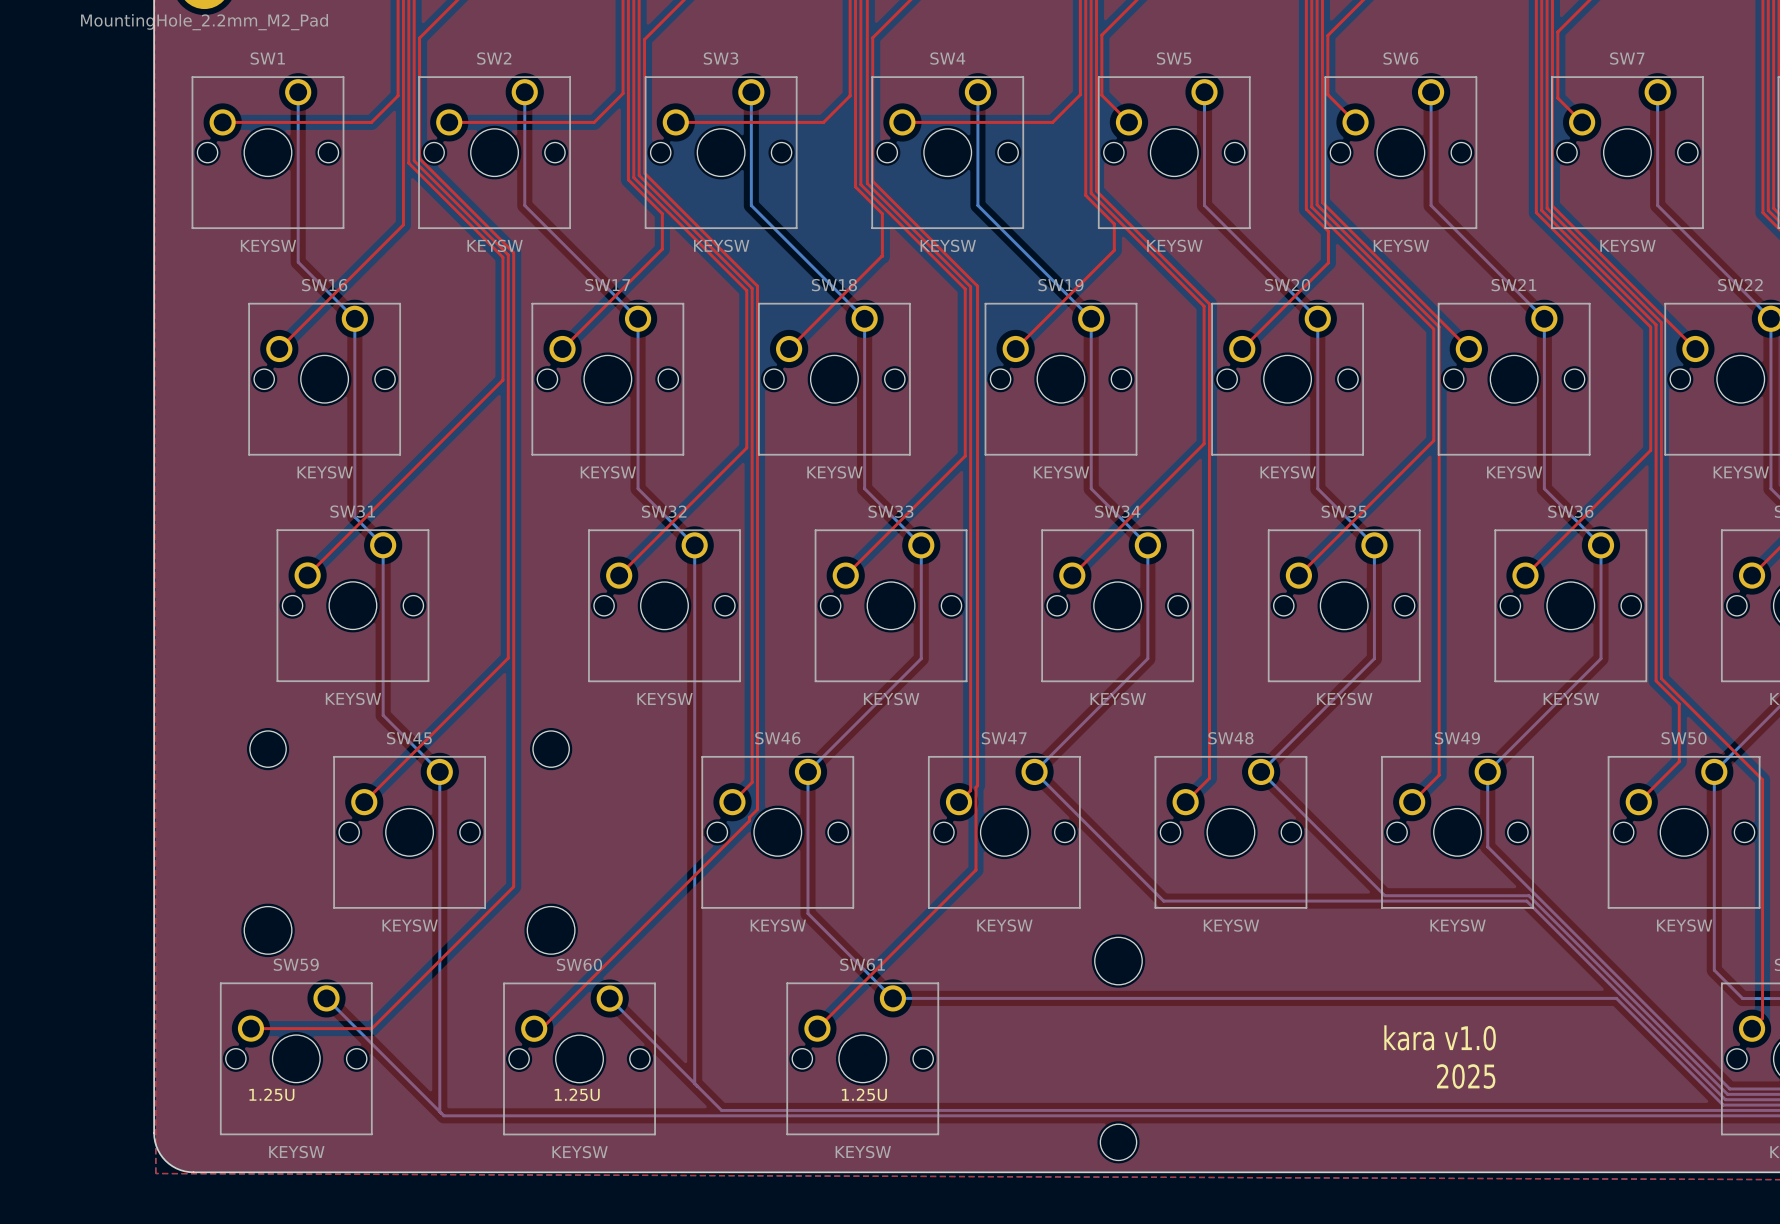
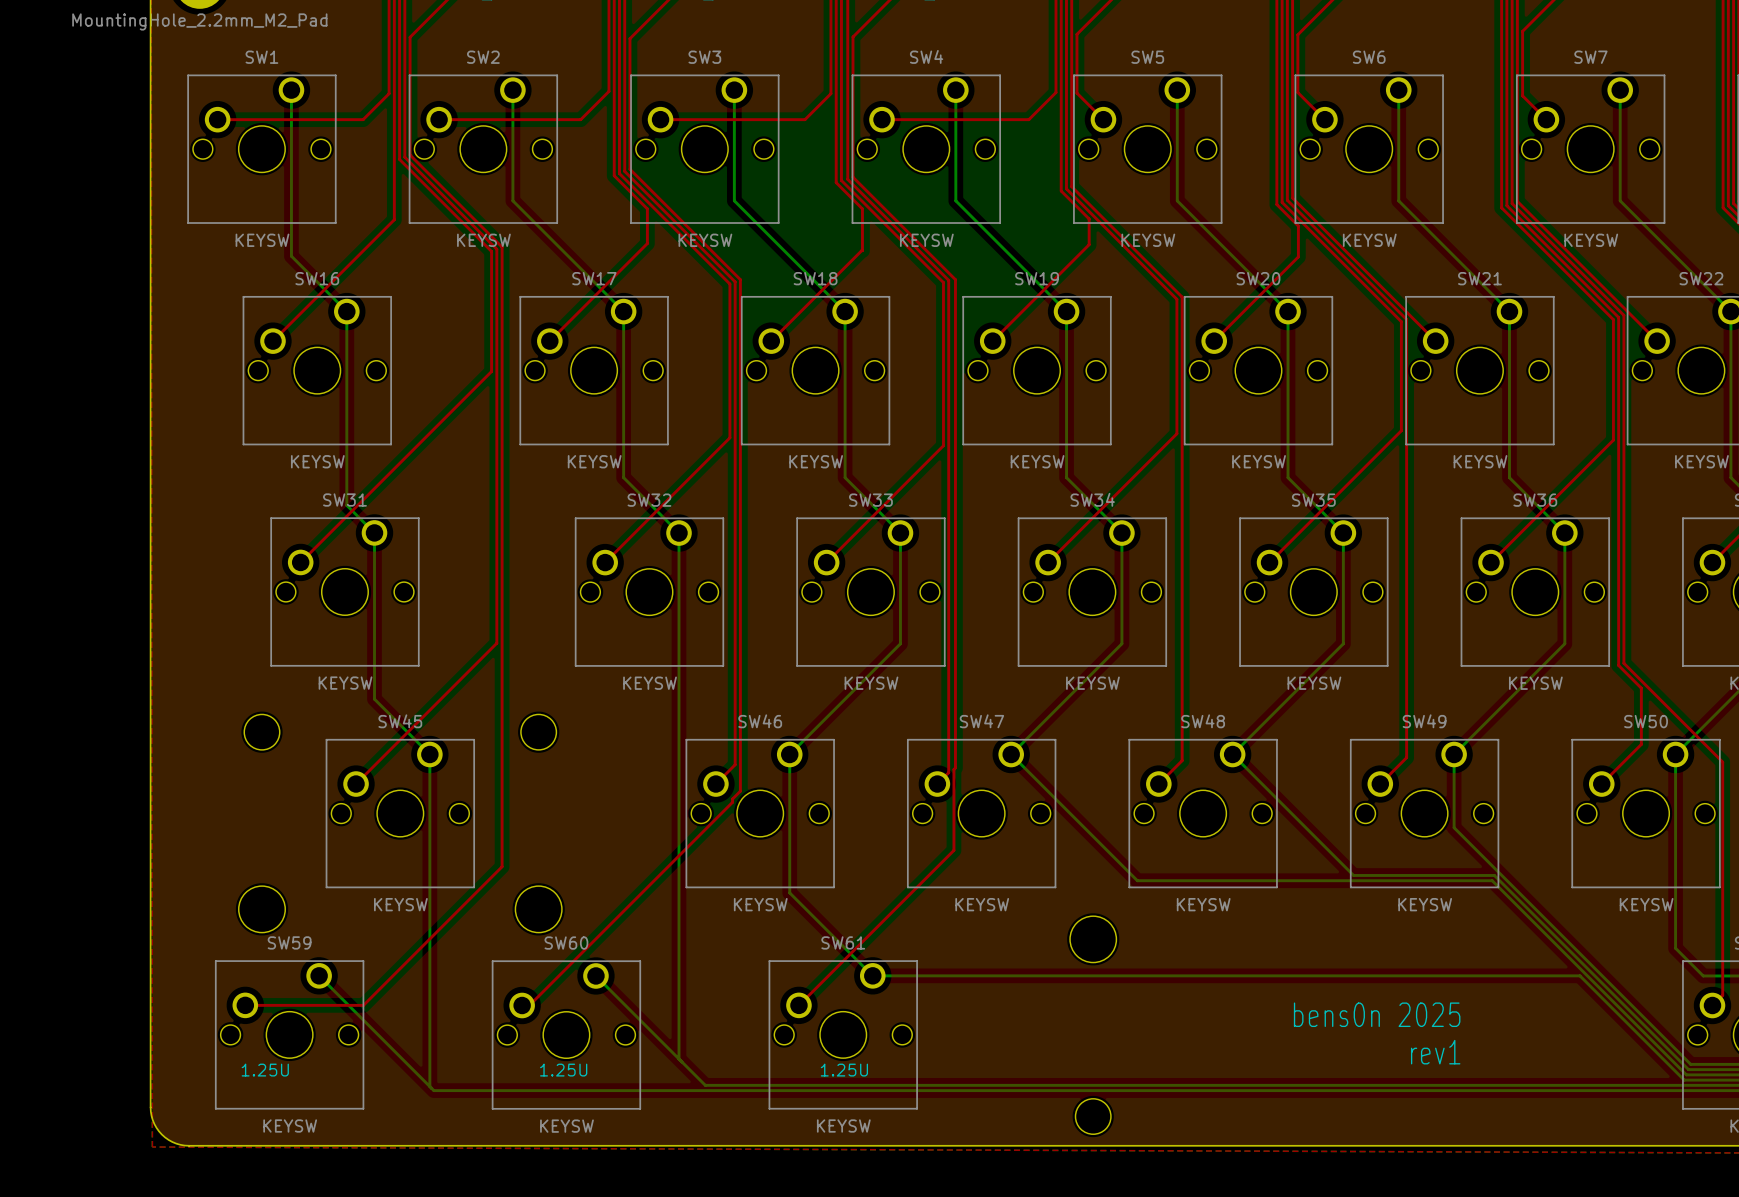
text: kara v1.0 (1440, 1037) -> bens0n 2025 (1377, 1014)
text: 2025 (1466, 1076) -> rev1 (1435, 1052)

